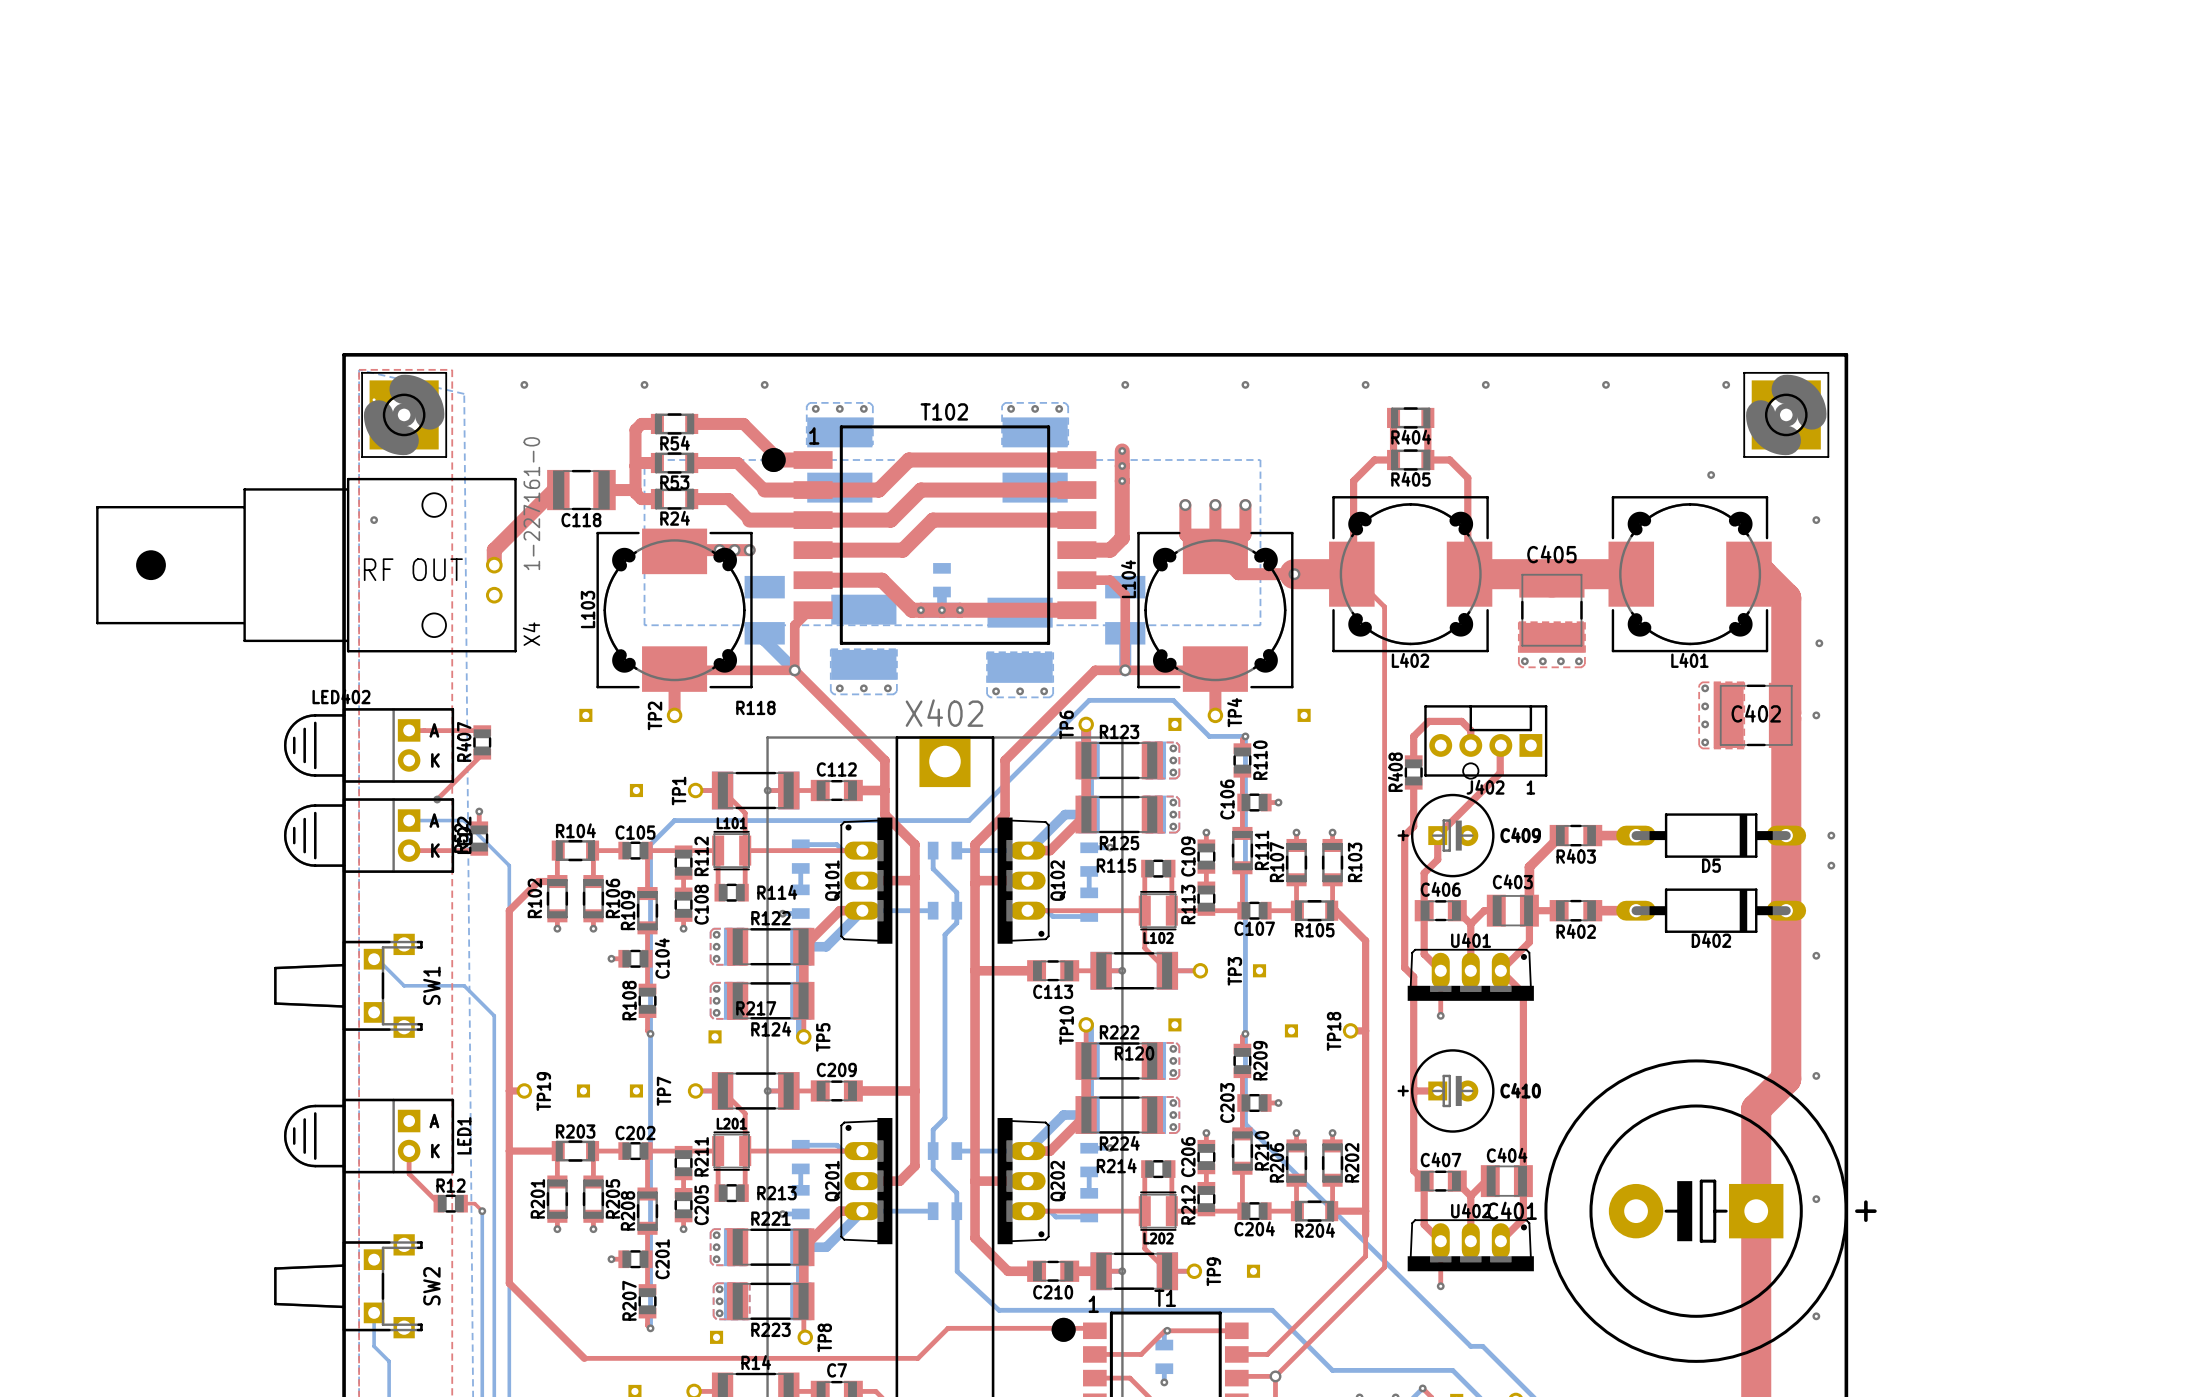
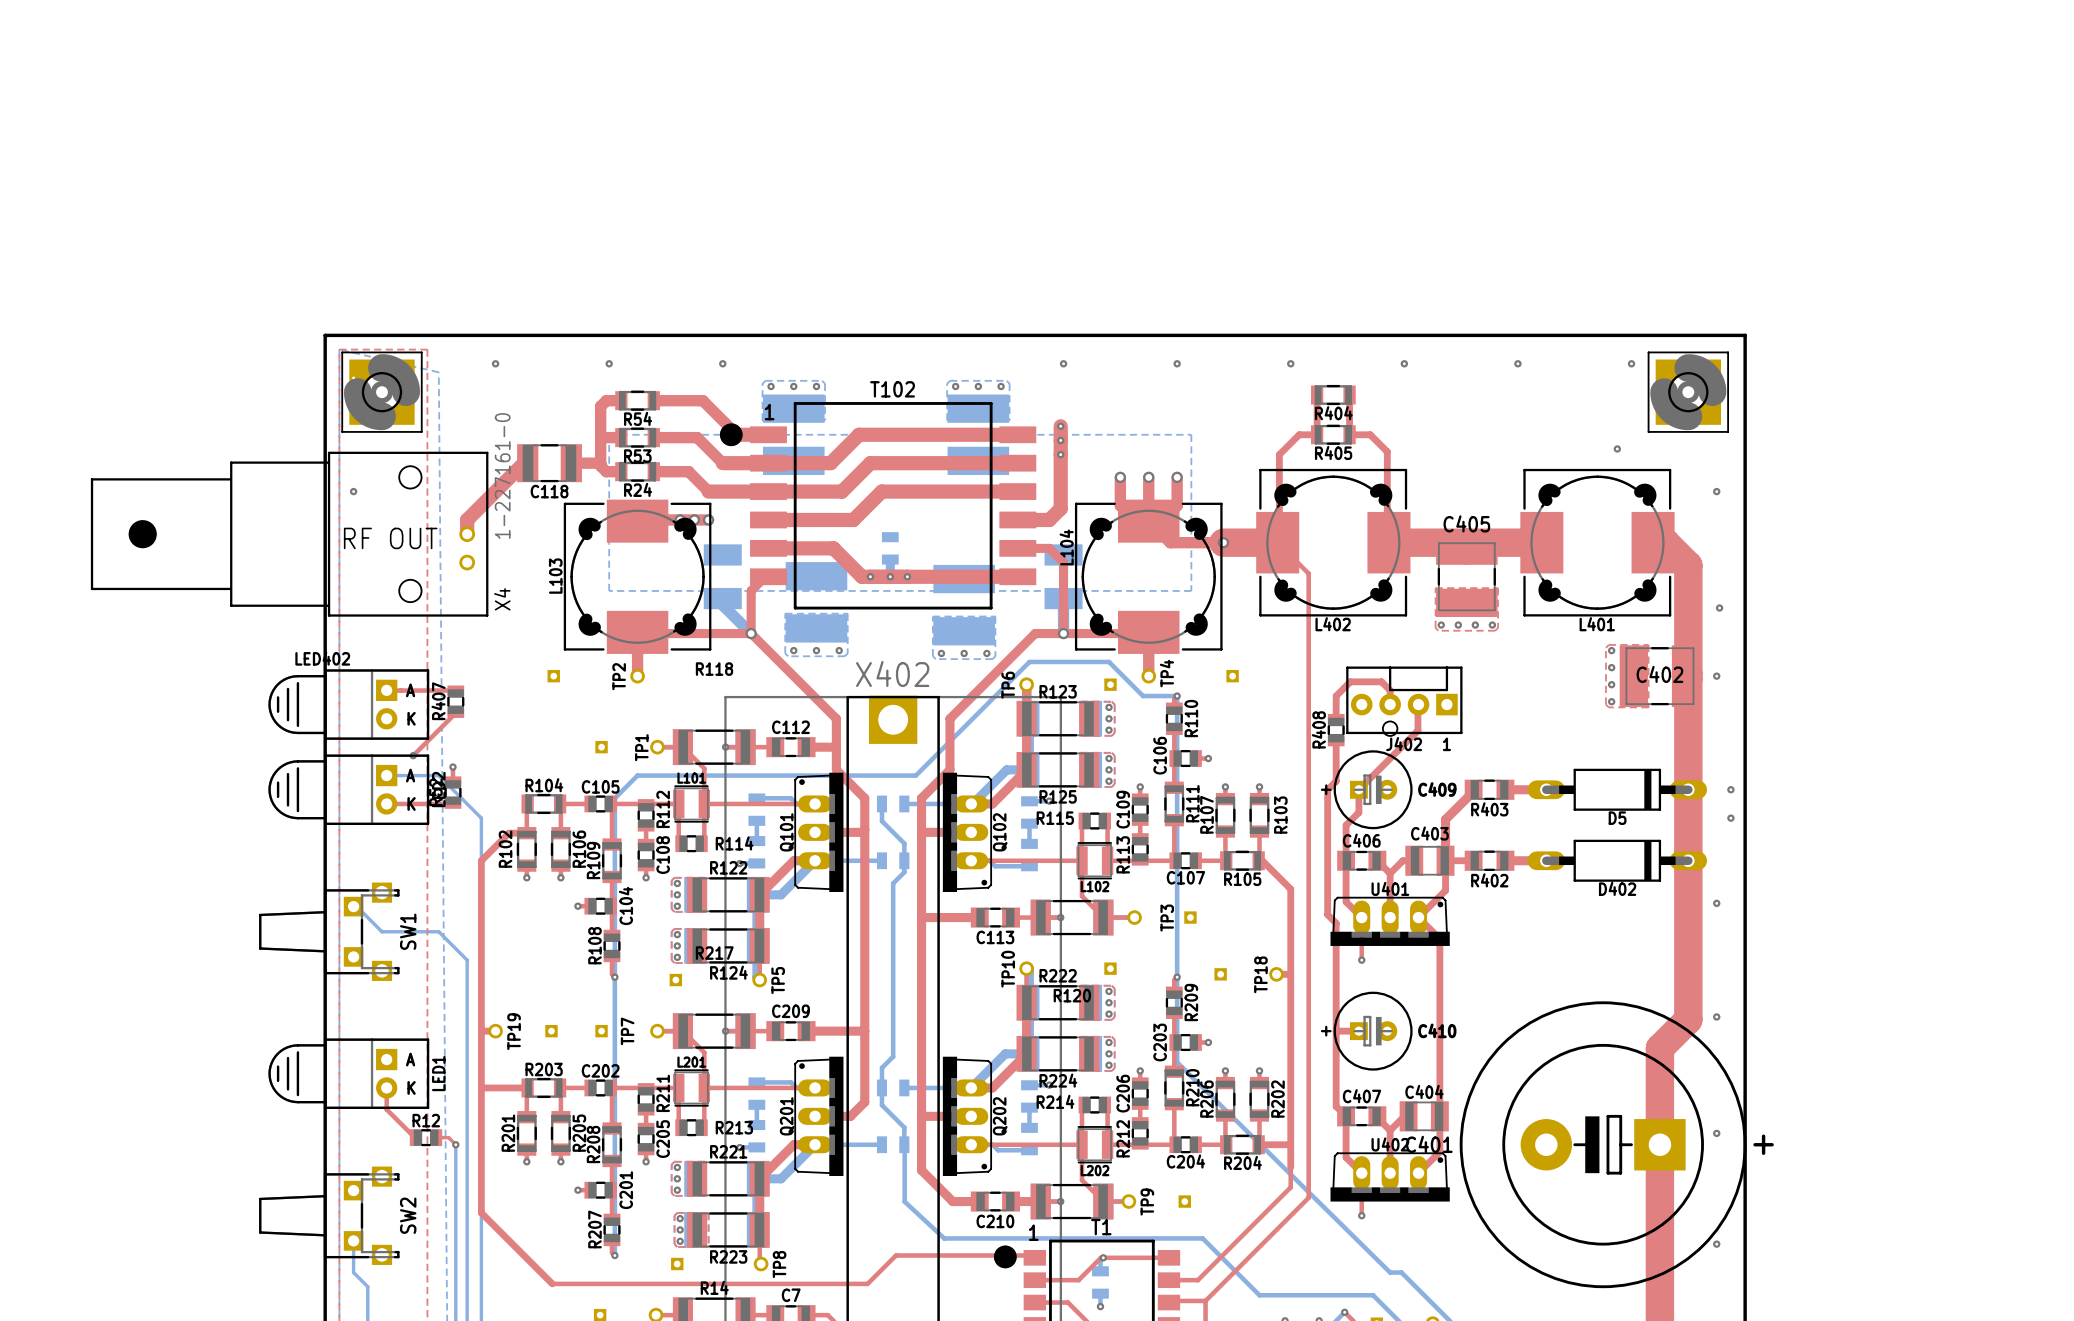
via: (1275, 1376) -> none

